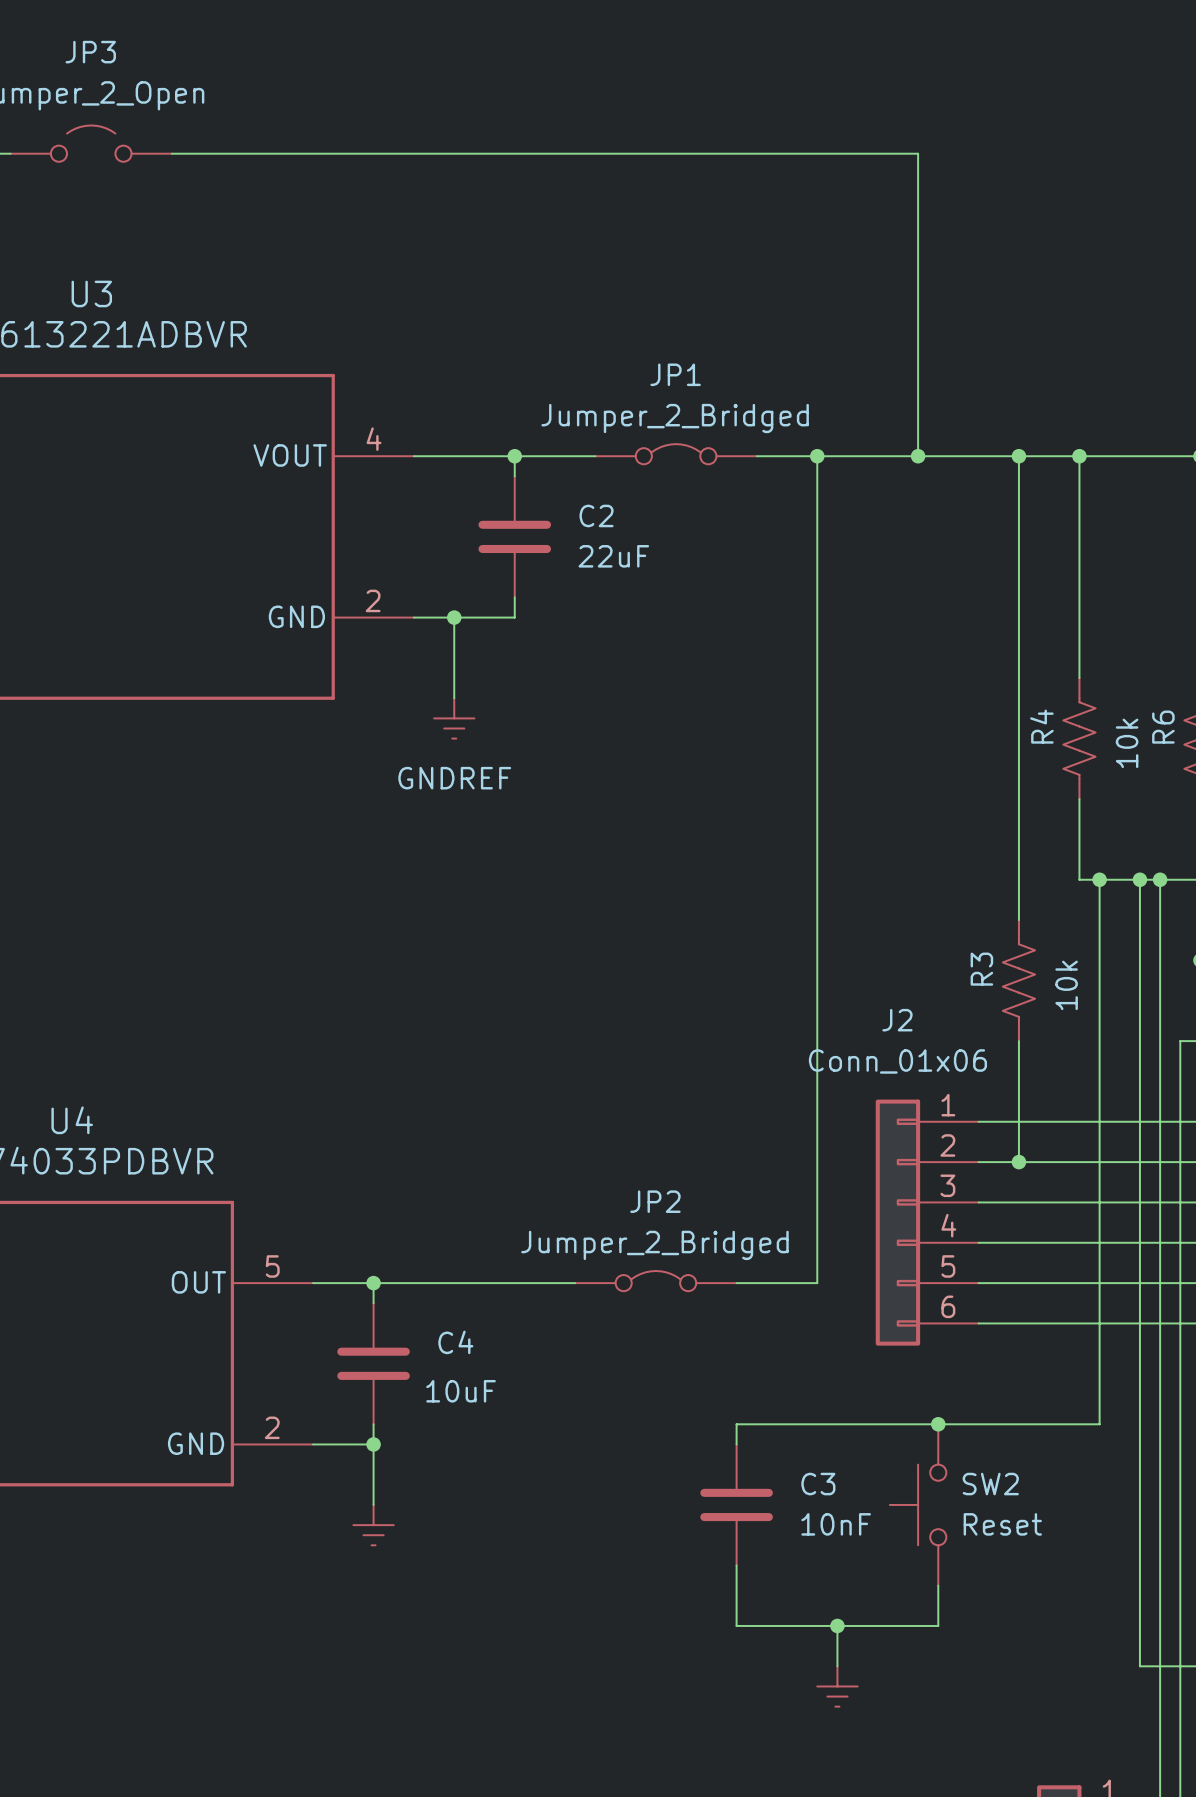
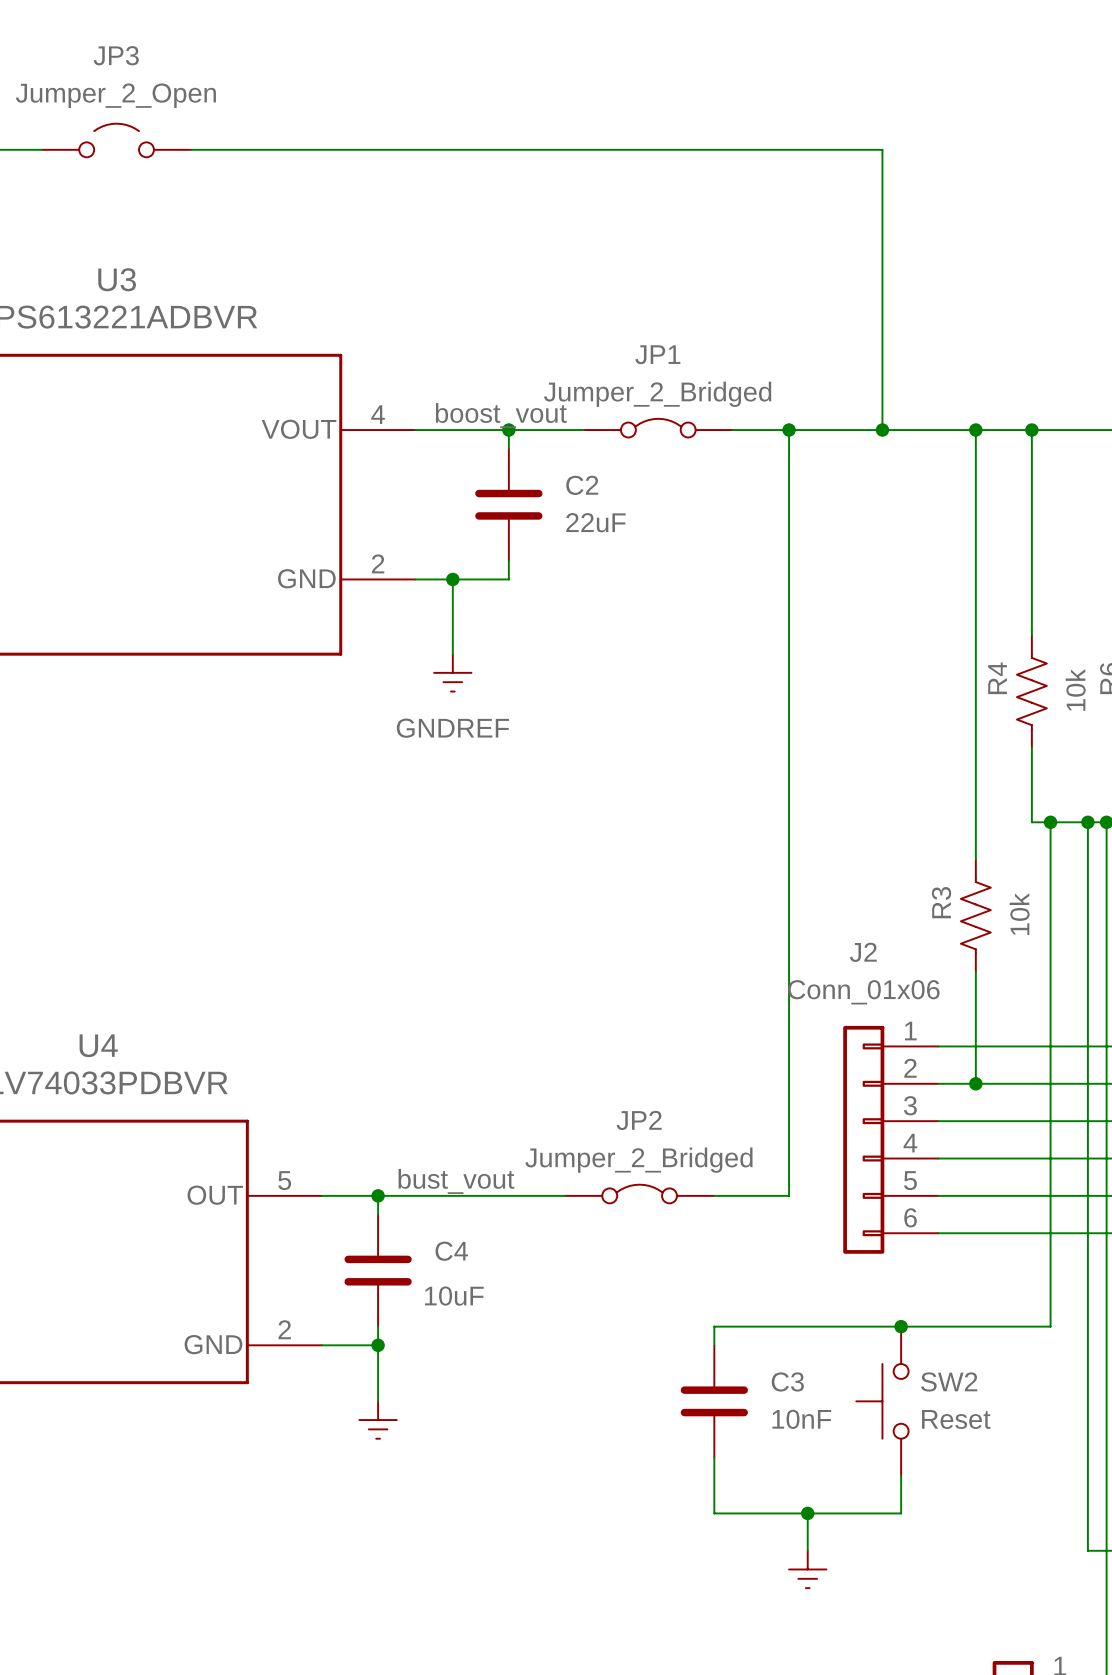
label: none -> boost_vout (501, 415)
label: none -> bust_vout (456, 1181)

